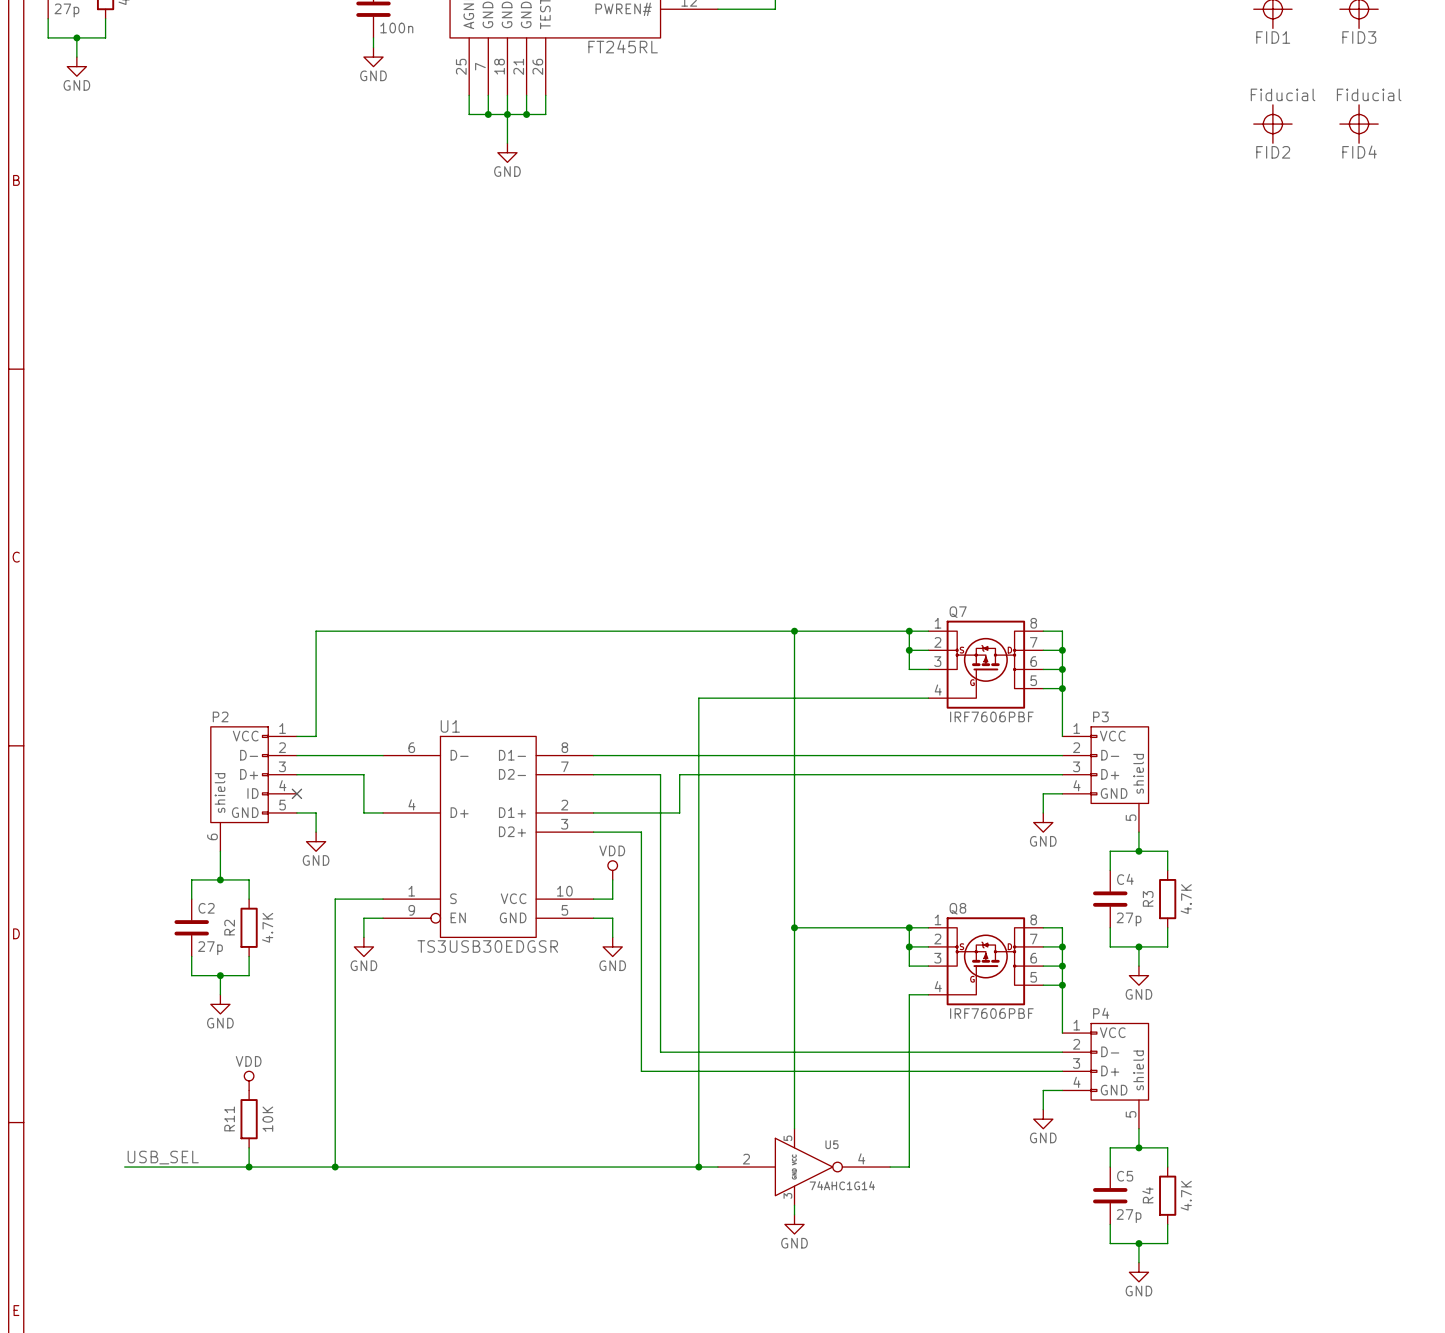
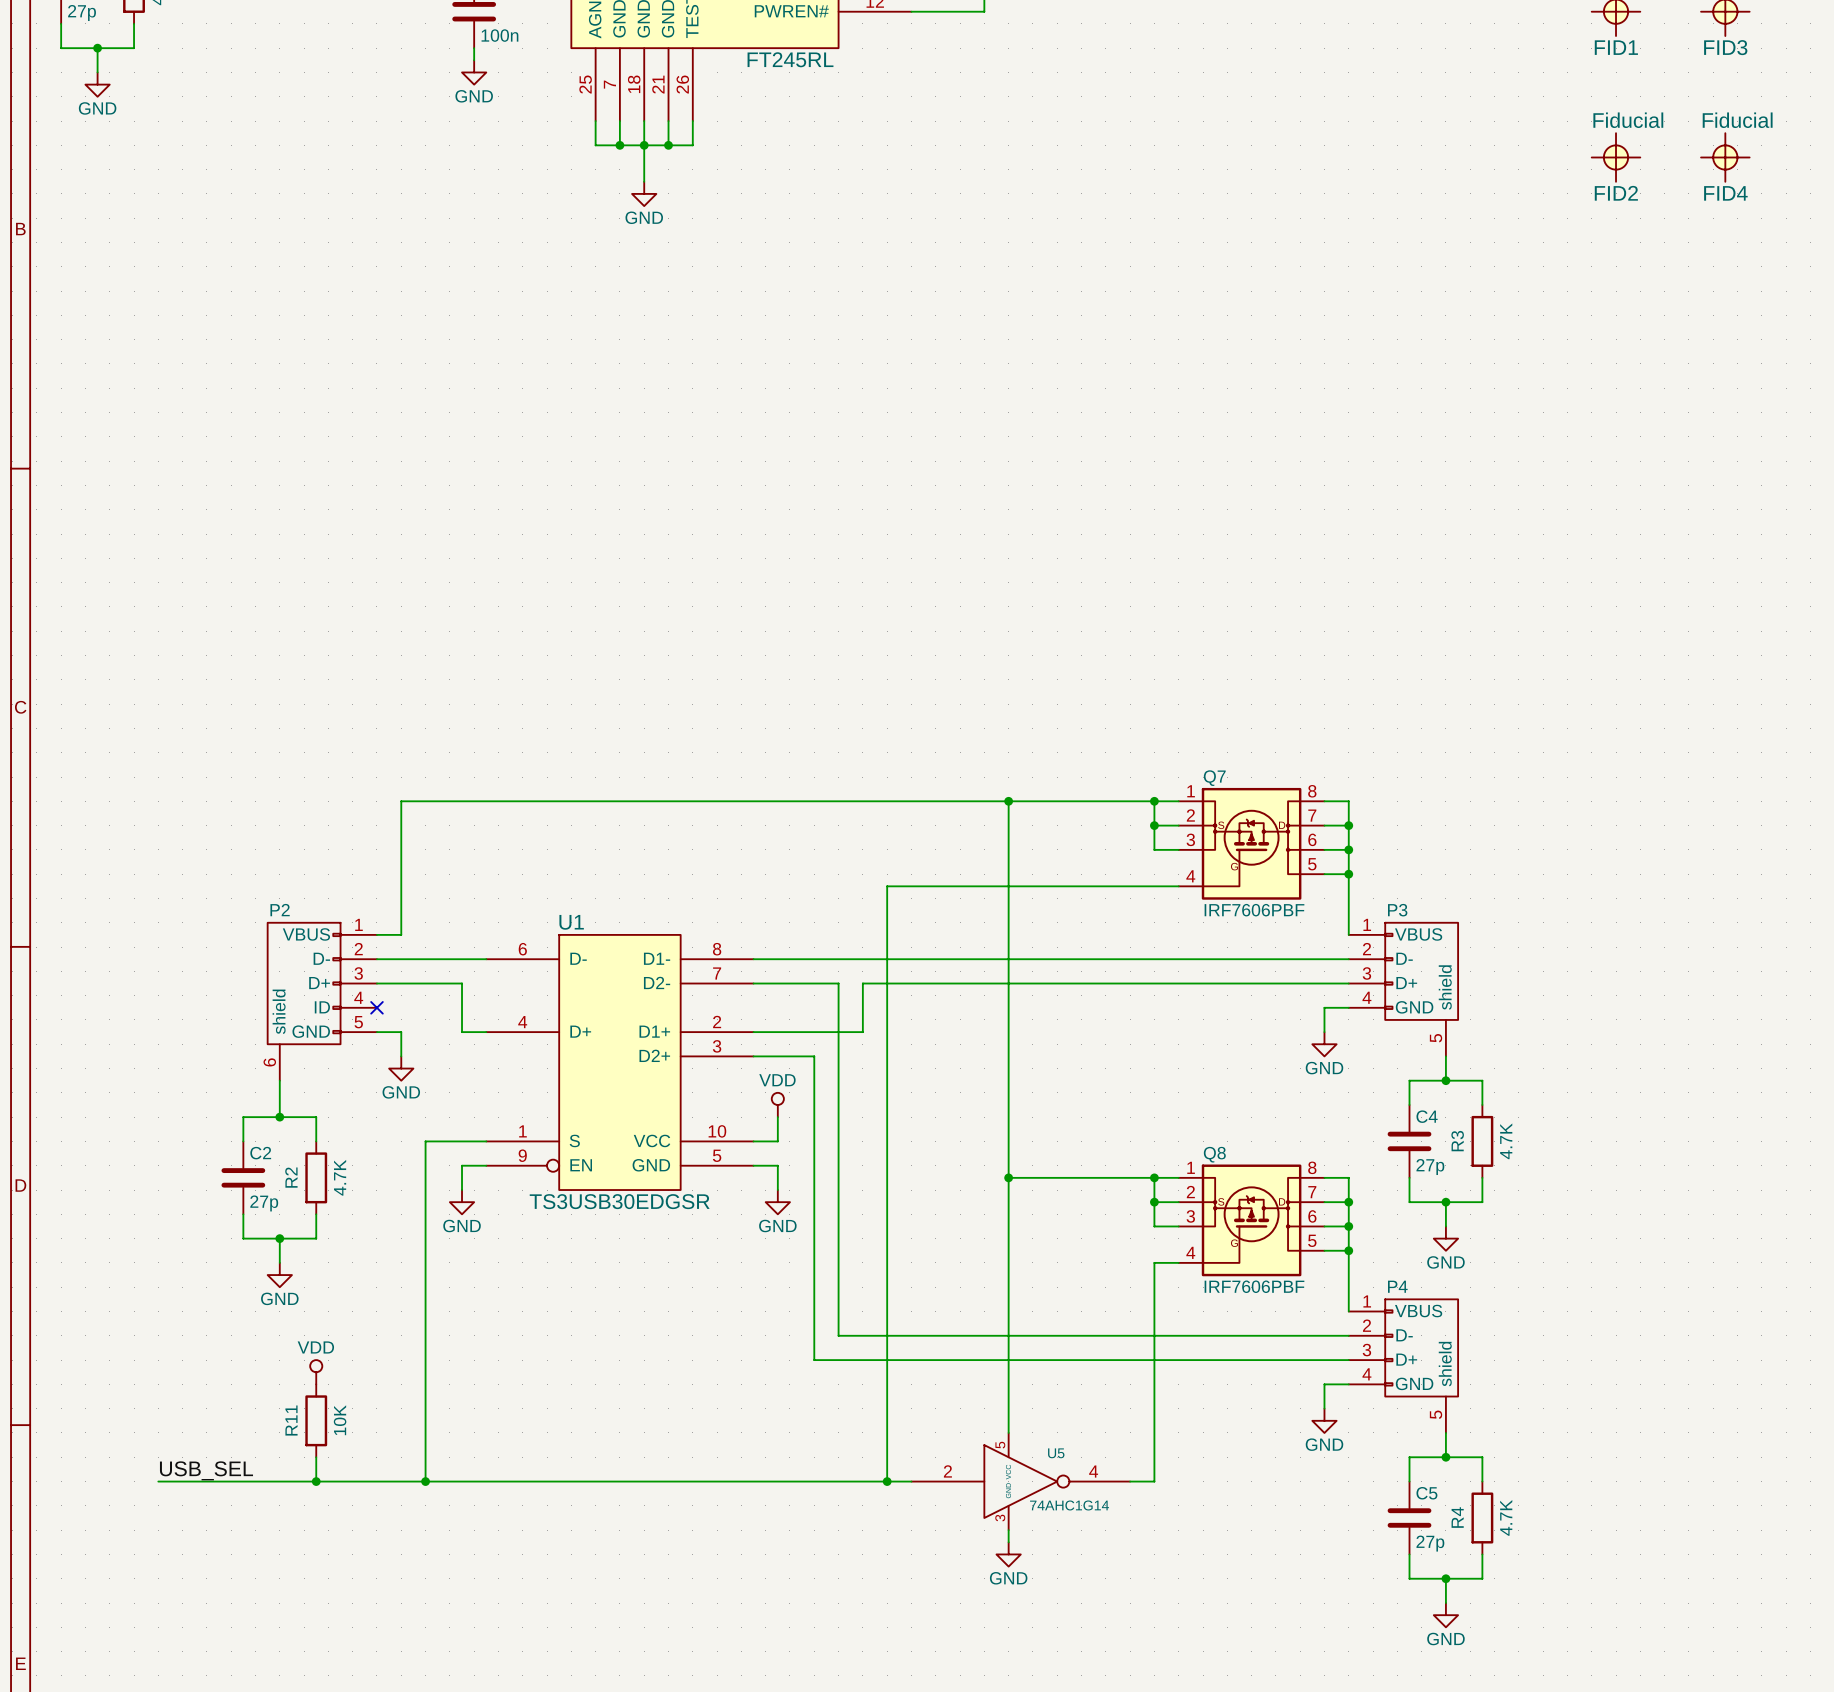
P2 pin name: VCC (245, 736) -> VBUS (306, 934)
P3 pin name: VCC (1112, 736) -> VBUS (1418, 934)
P4 pin name: VCC (1112, 1032) -> VBUS (1418, 1311)

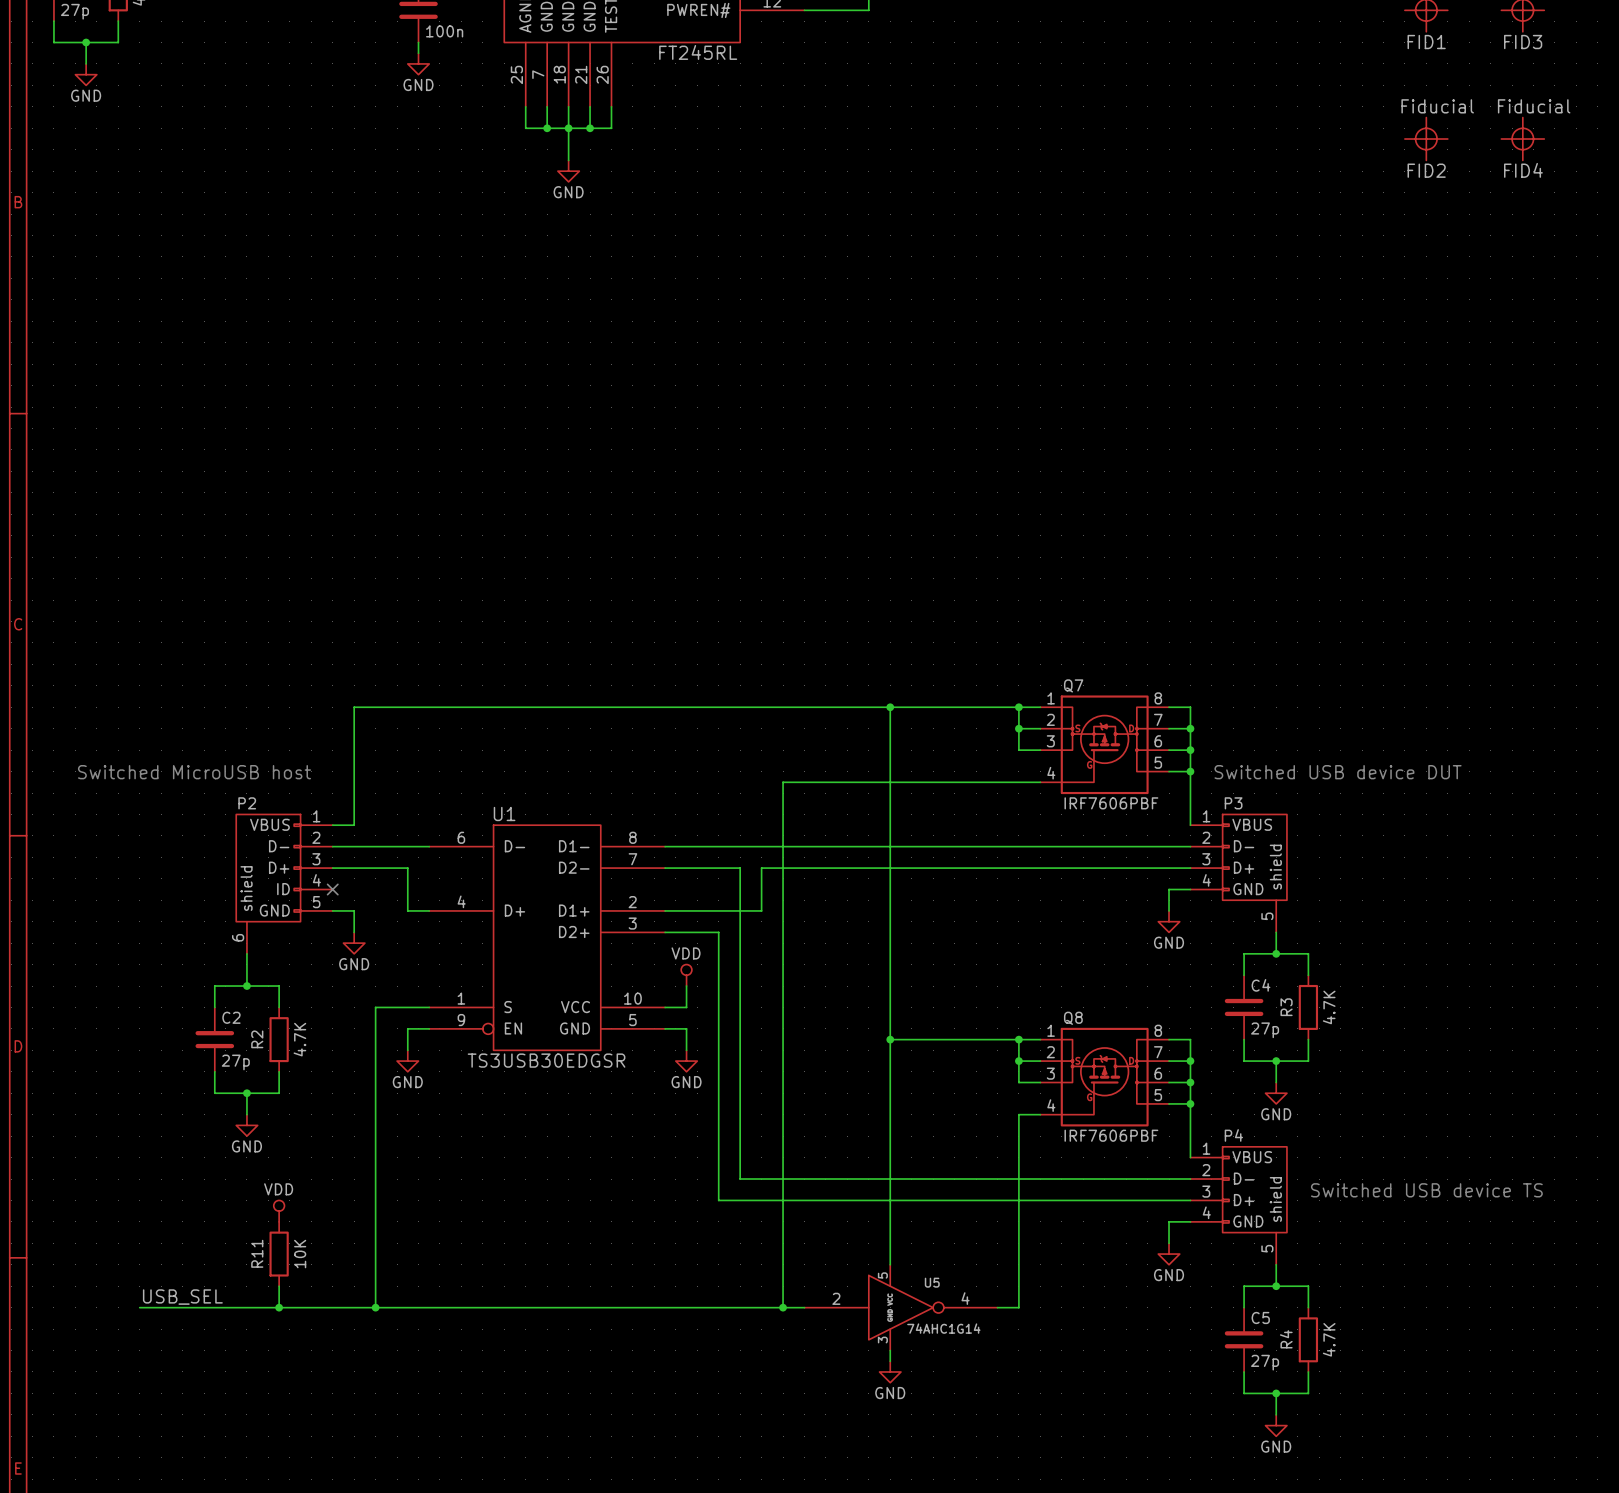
text: none -> Switched MicroUSB host (194, 772)
text: none -> Switched USB device DUT (1338, 772)
text: none -> Switched USB device TS (1426, 1190)

